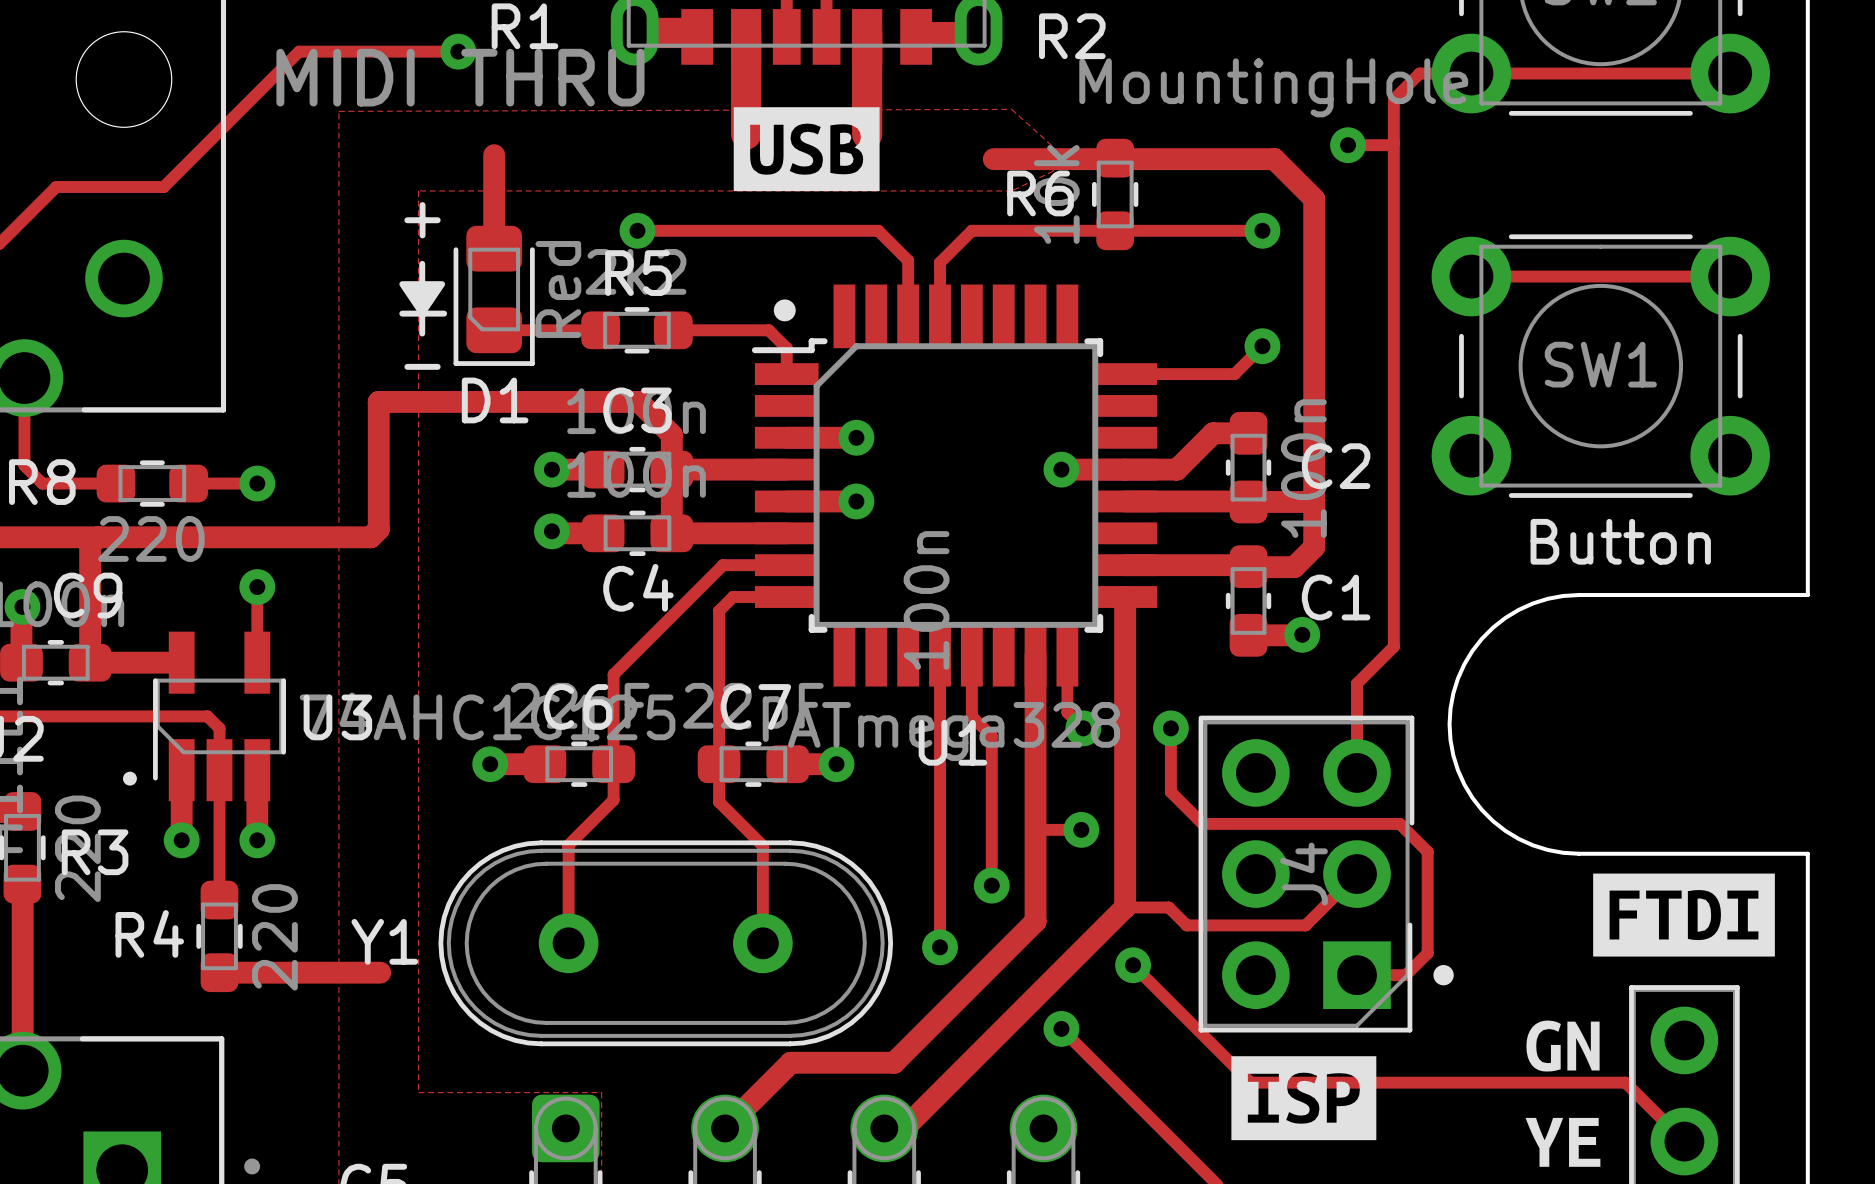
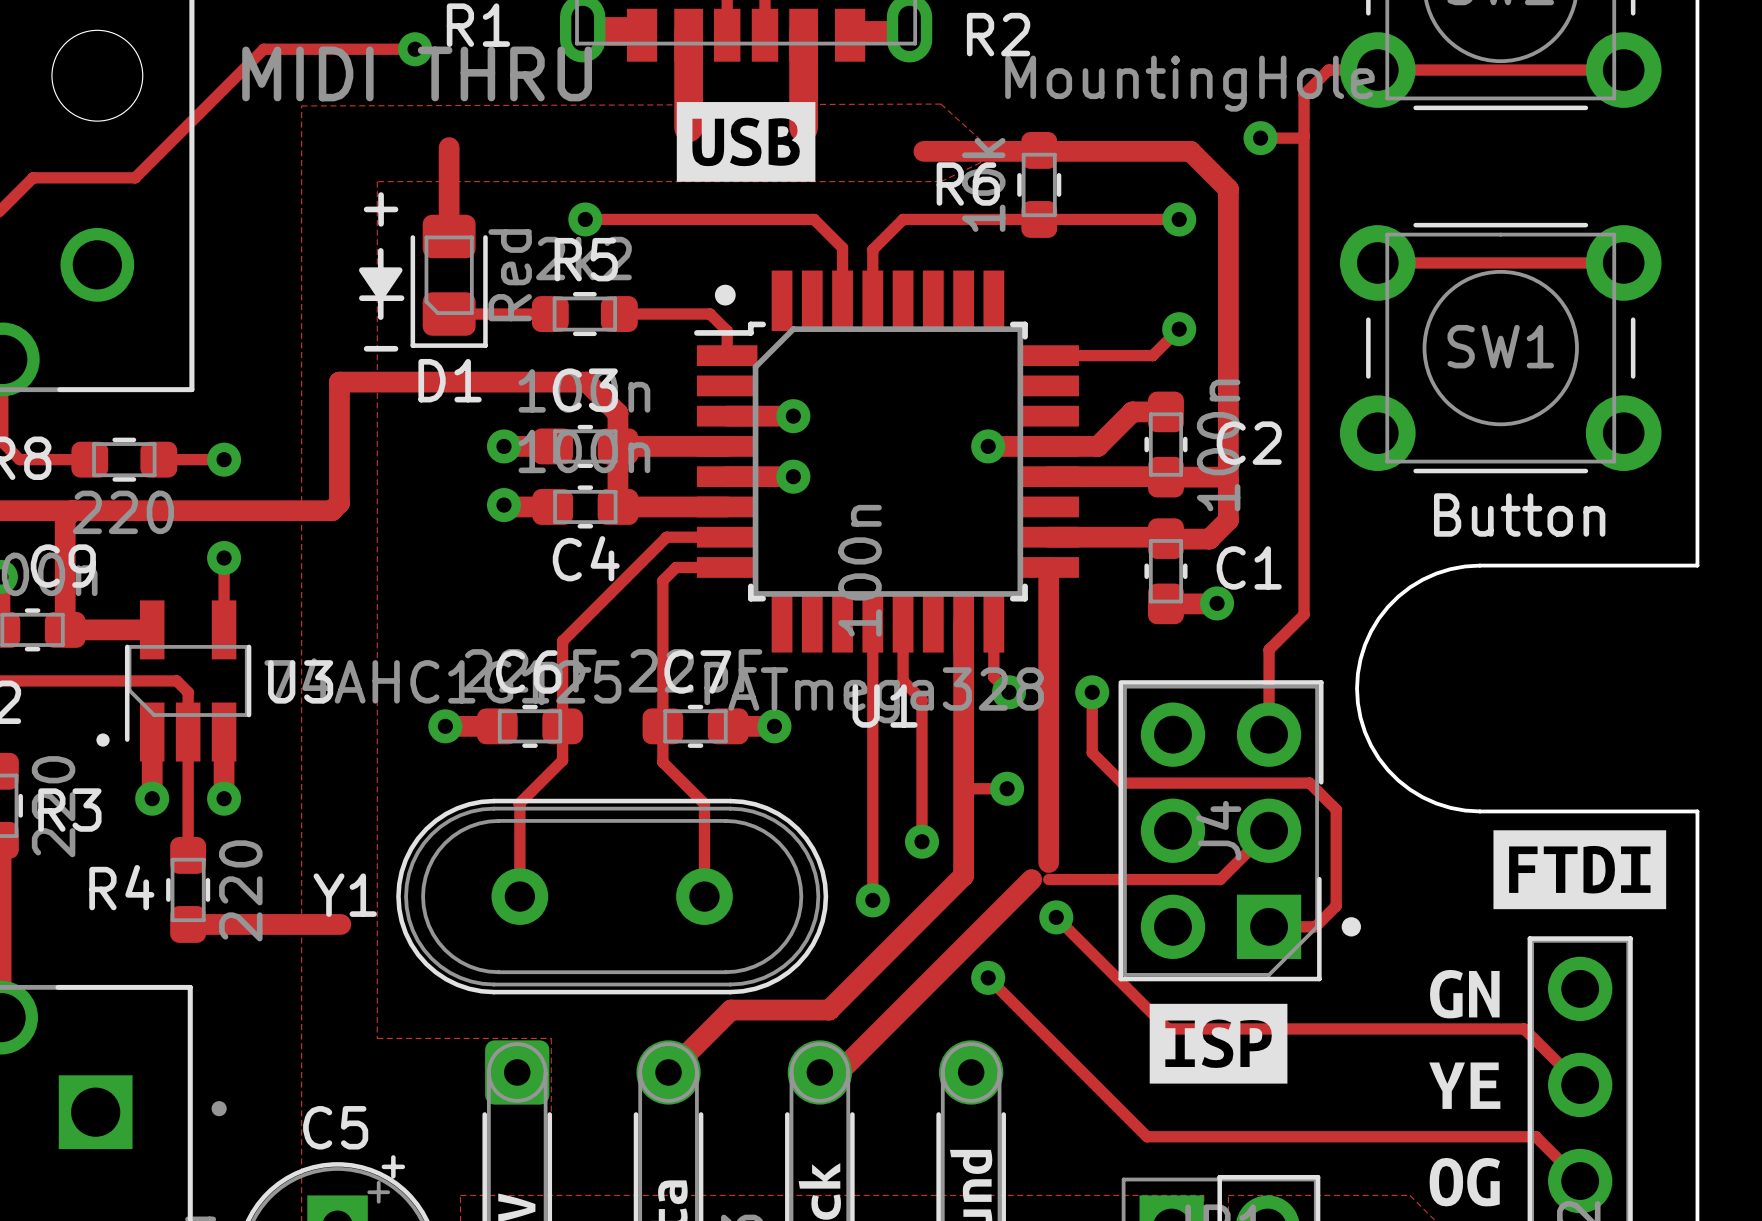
track: (1107, 925) (1125, 907) (1168, 907) (1186, 925) -> (1048, 879) (1107, 879)

